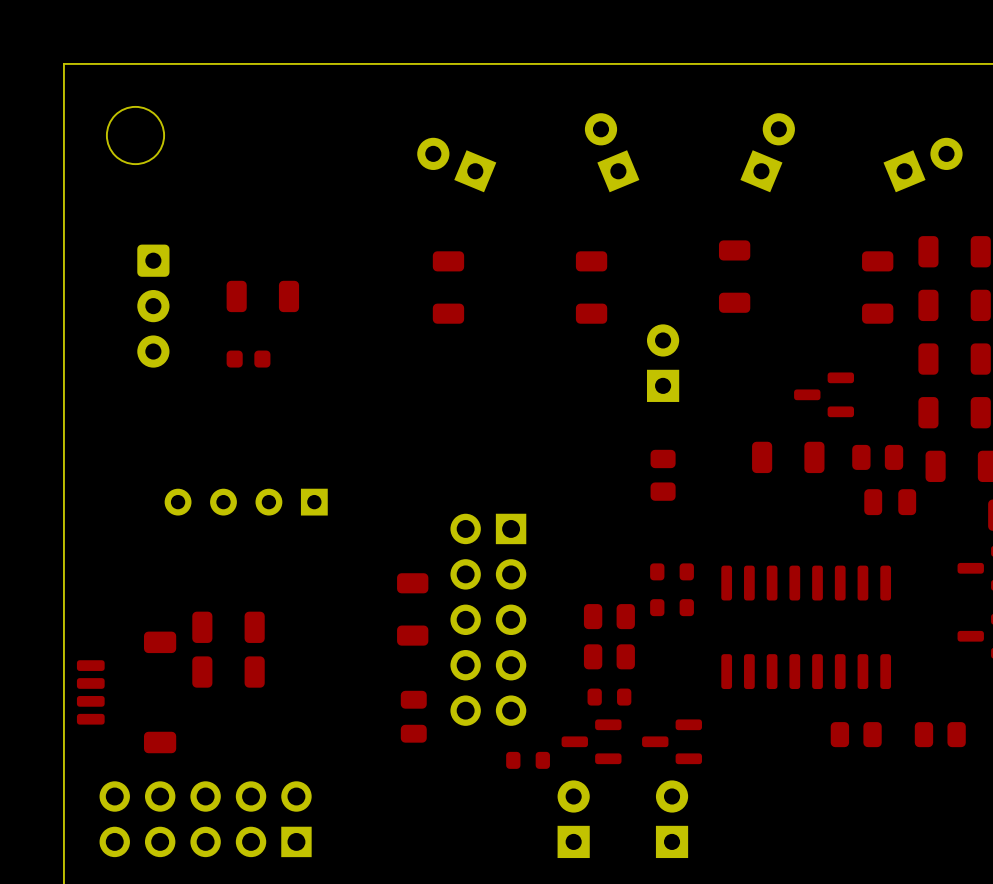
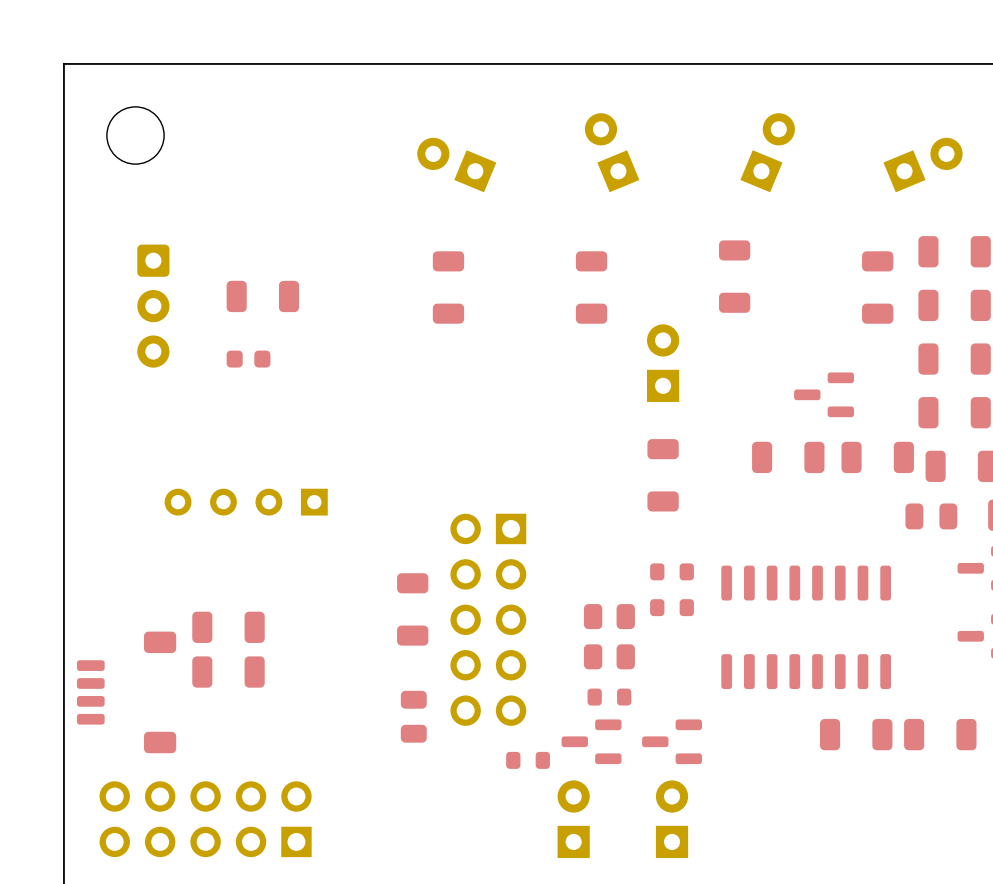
part footprint: [852, 444, 904, 470] -> [841, 441, 914, 474]
part footprint: [650, 449, 676, 501] -> [647, 439, 679, 512]
part position: (890, 502) -> (931, 516)
part footprint: [830, 722, 882, 748] -> [820, 718, 893, 751]
part footprint: [914, 722, 966, 748] -> [904, 718, 977, 751]

